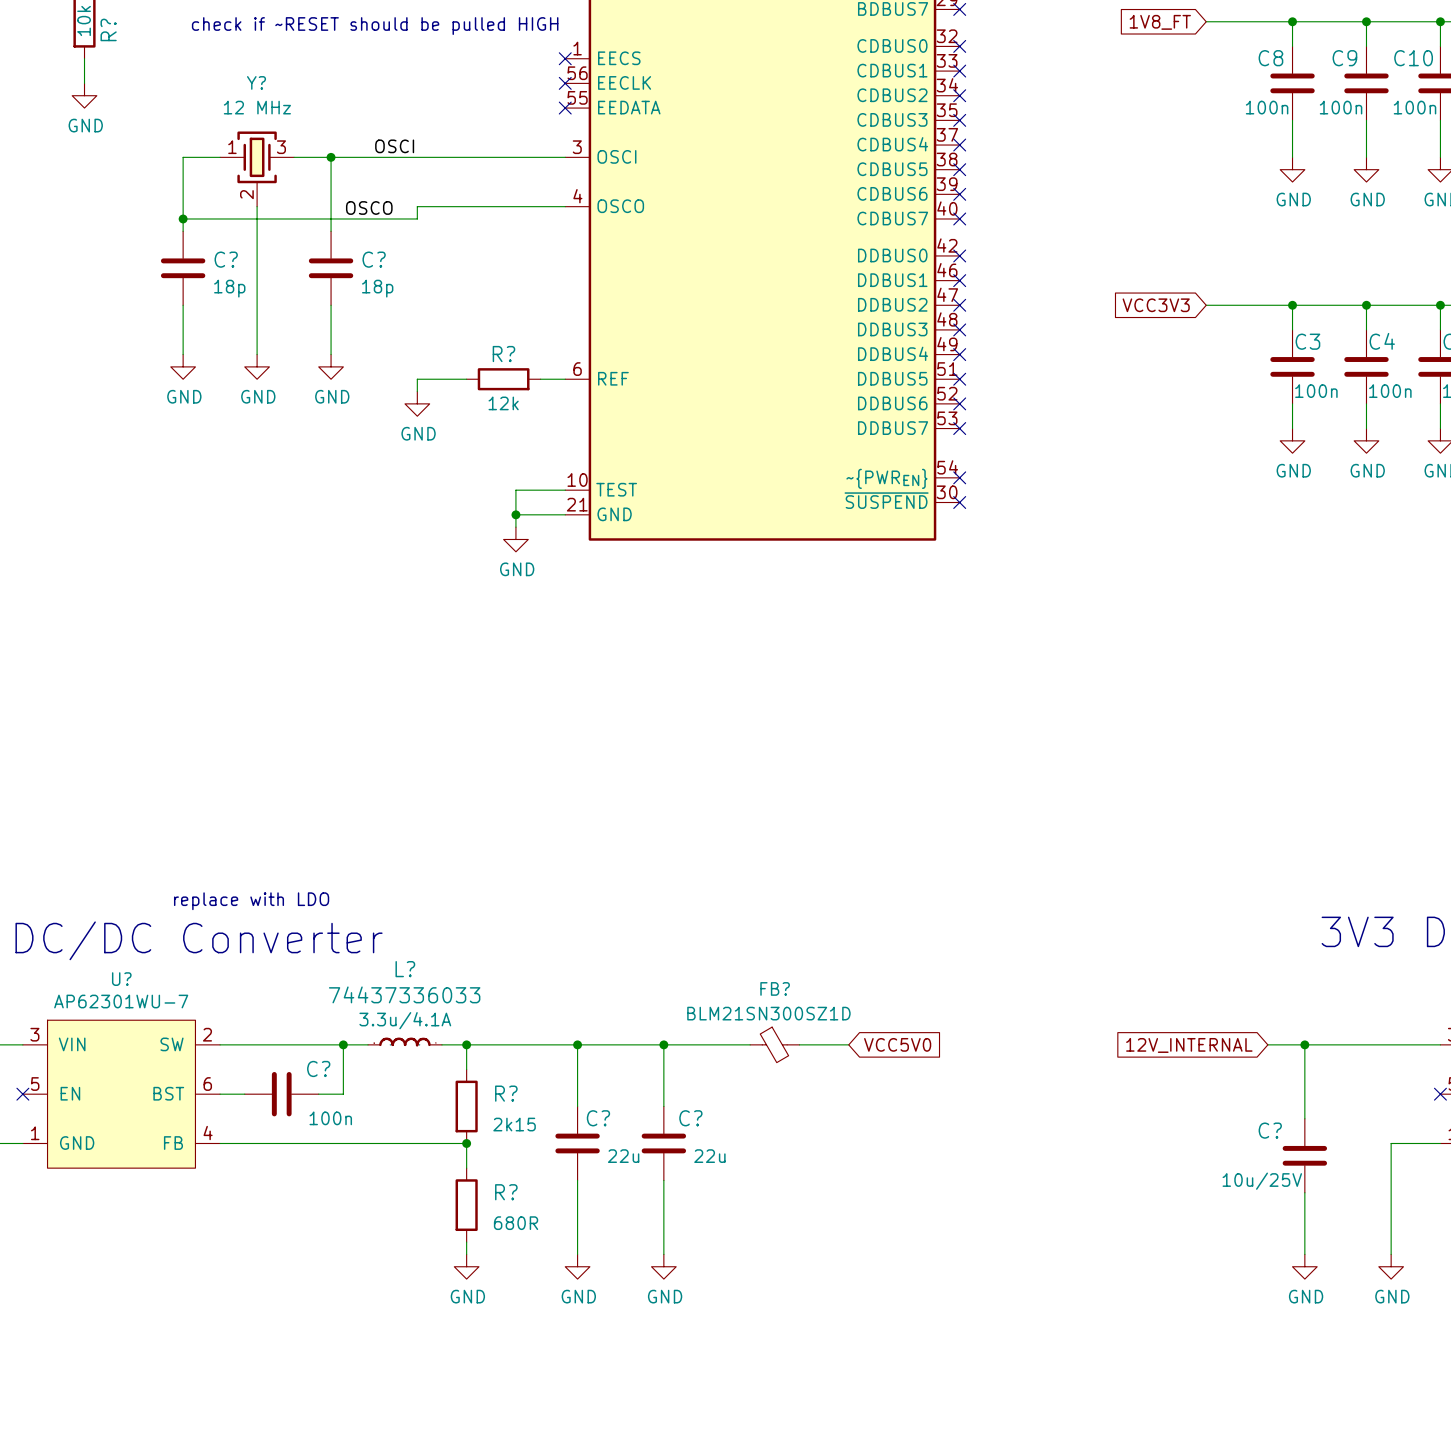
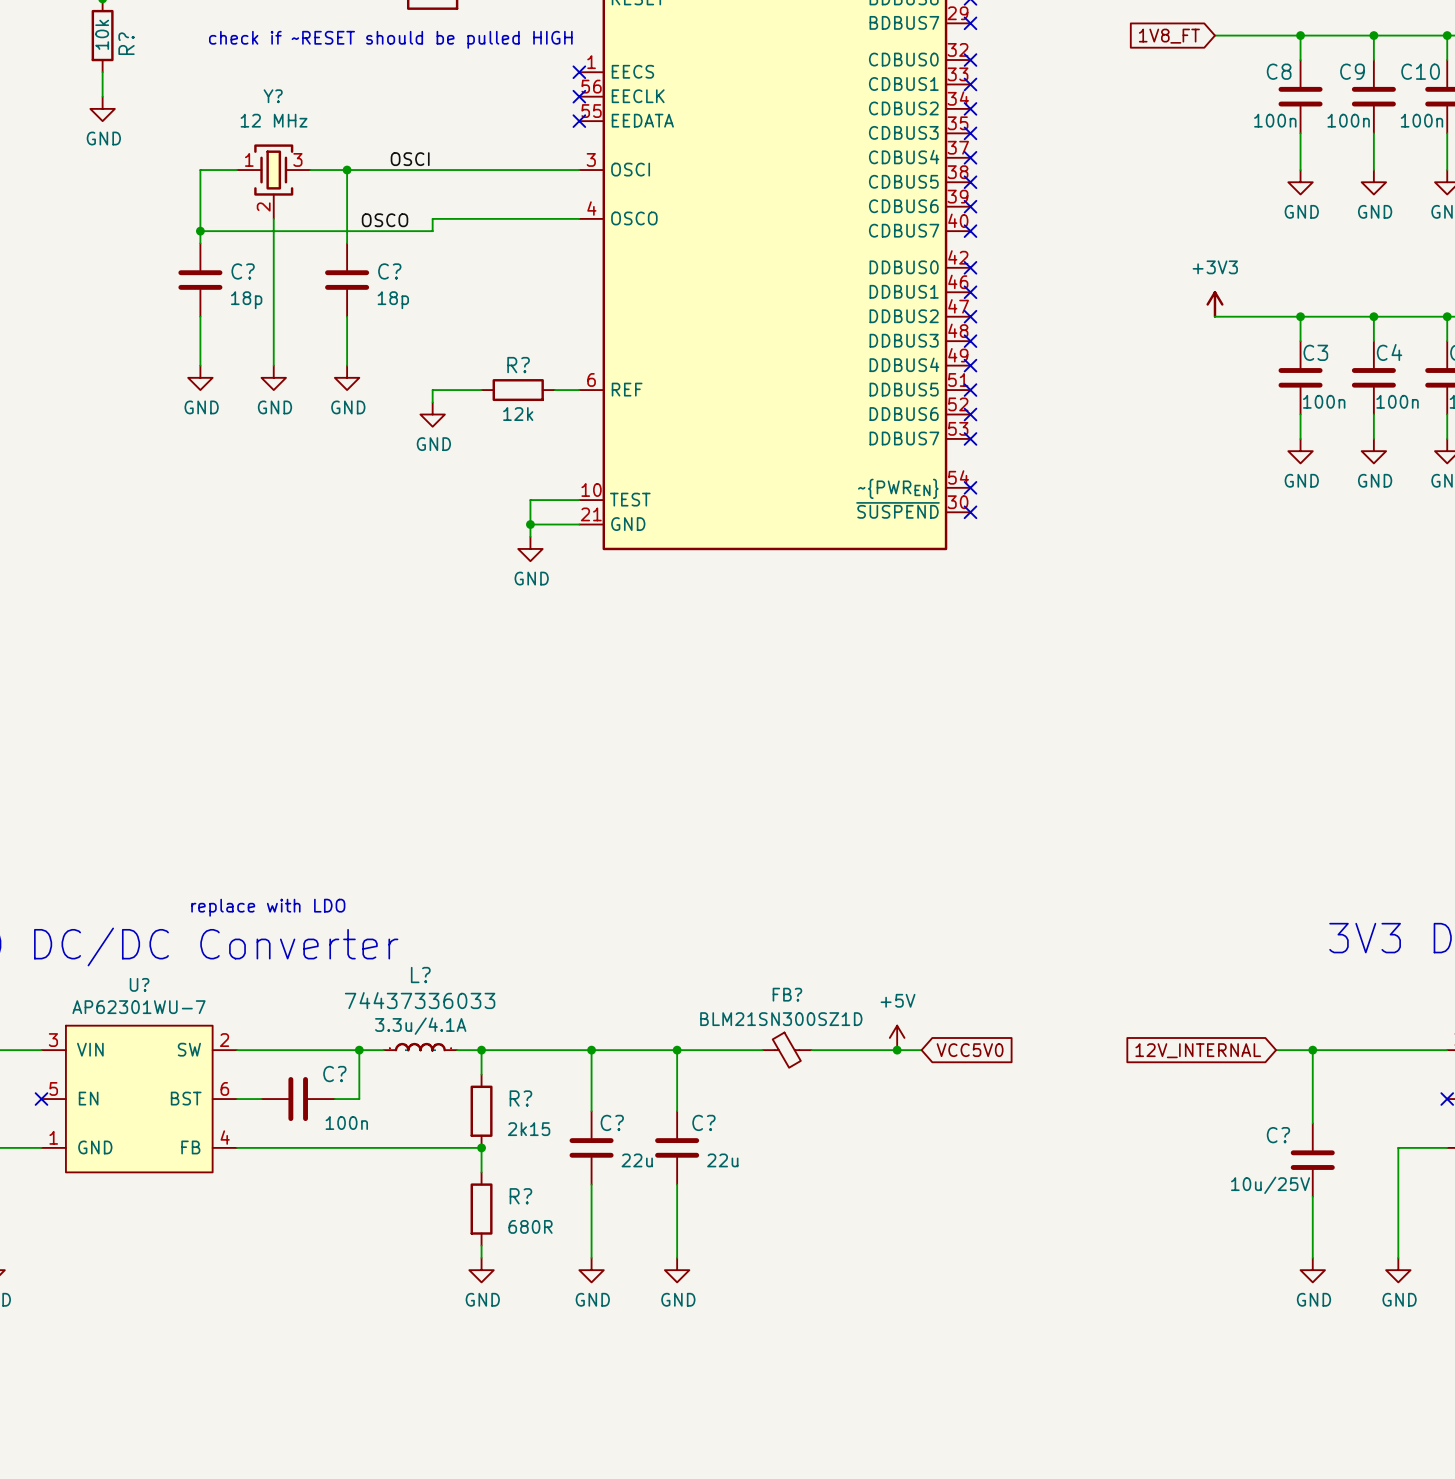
power symbol: none -> +3V3 (1214, 304)
global label: VCC3V3 (1156, 305) -> none
power symbol: none -> +5V (897, 1037)
wire: none -> (860, 1050) (921, 1050)
junction: none -> (897, 1050)
global label position: VCC5V0 (897, 1044) -> VCC5V0 (970, 1050)

